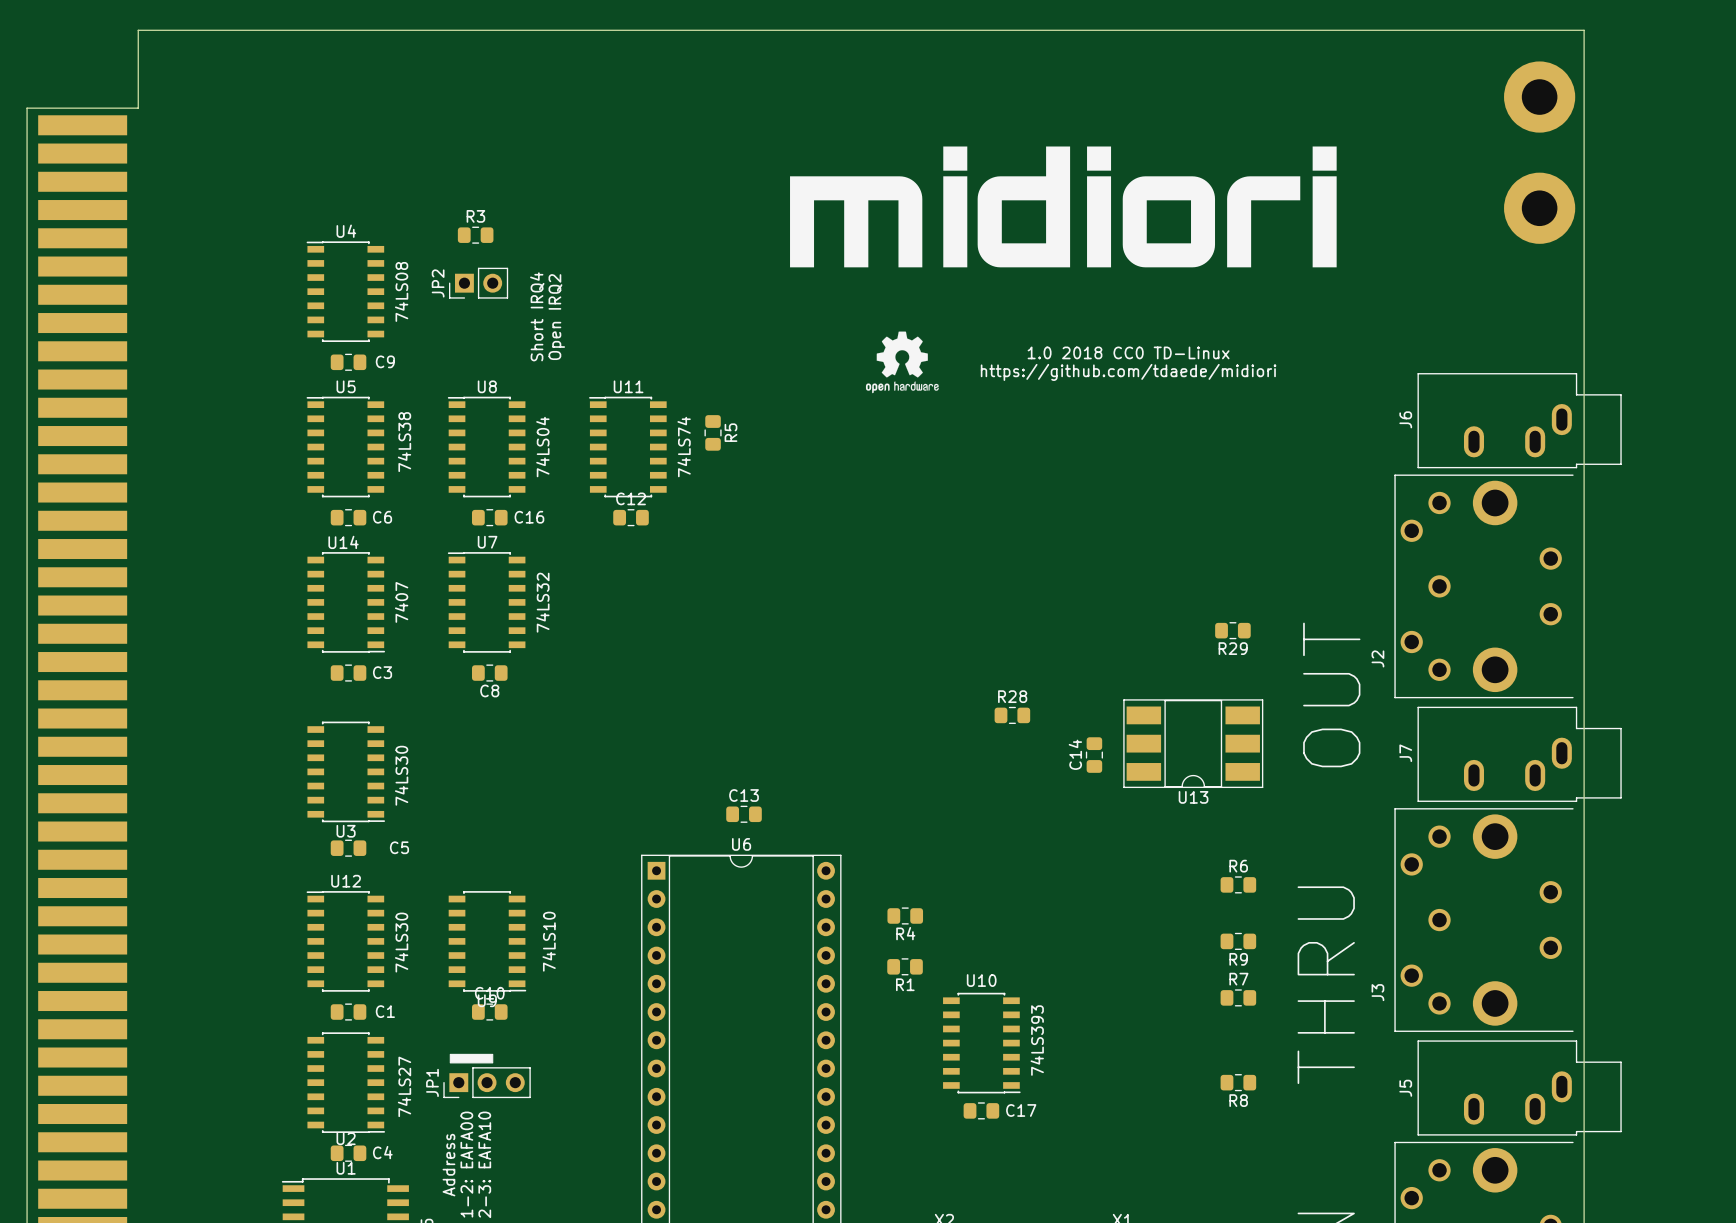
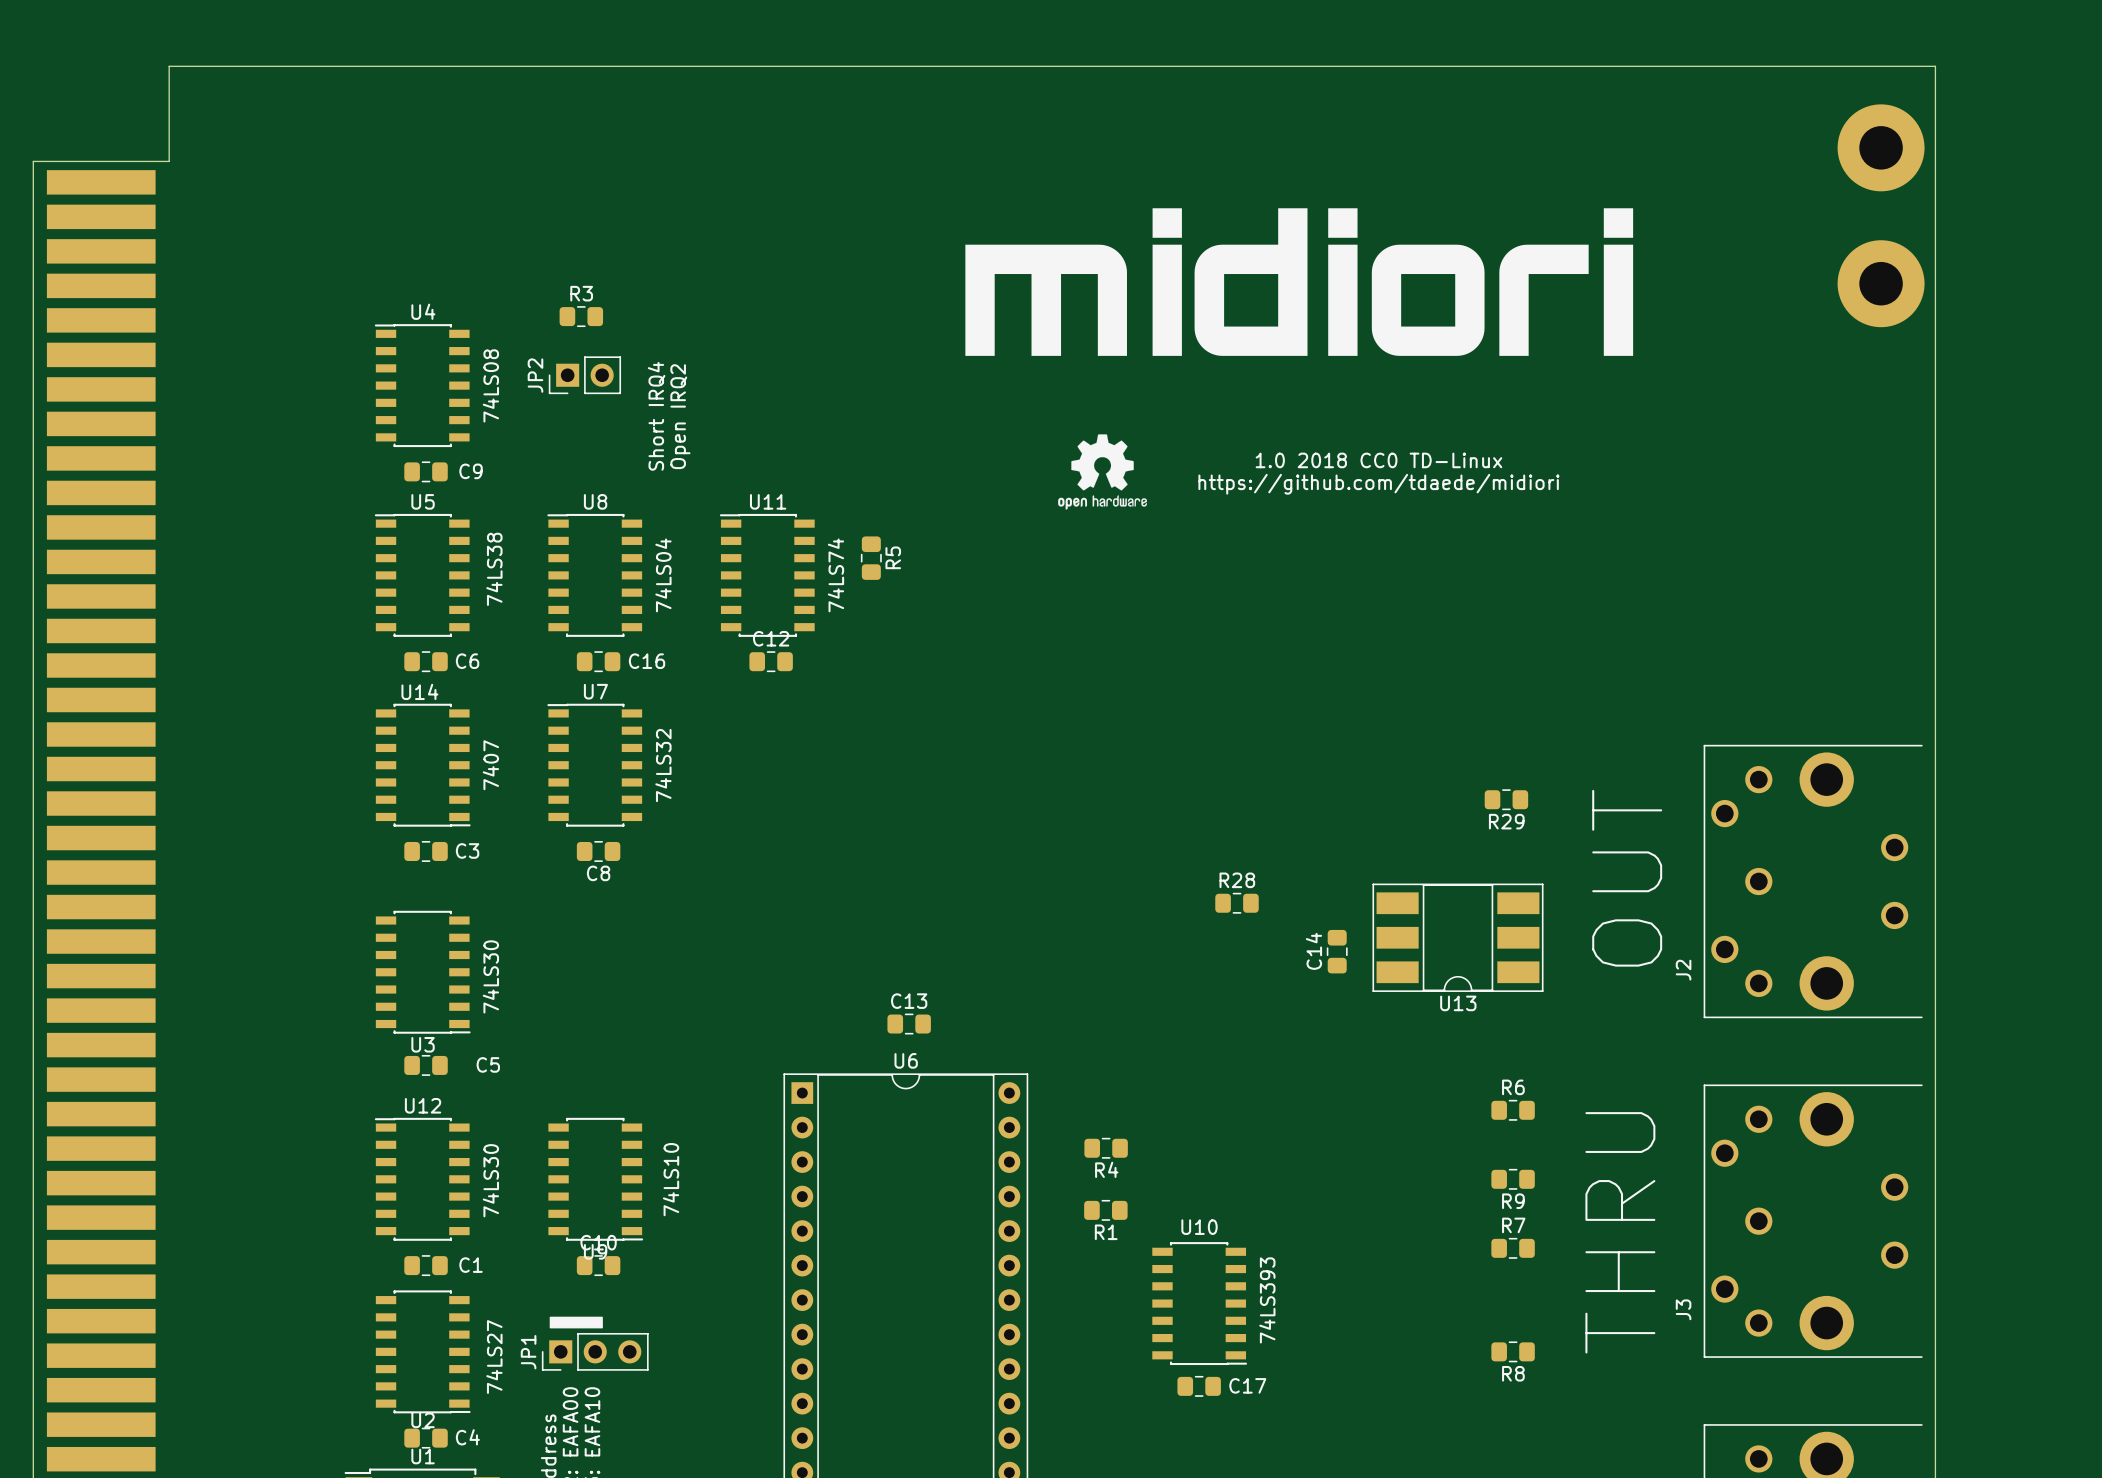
J6: (1519, 420) -> none
J2 position: (1484, 586) -> (1813, 881)
J7: (1519, 754) -> none
J3 position: (1484, 920) -> (1813, 1221)
J5: (1519, 1087) -> none

